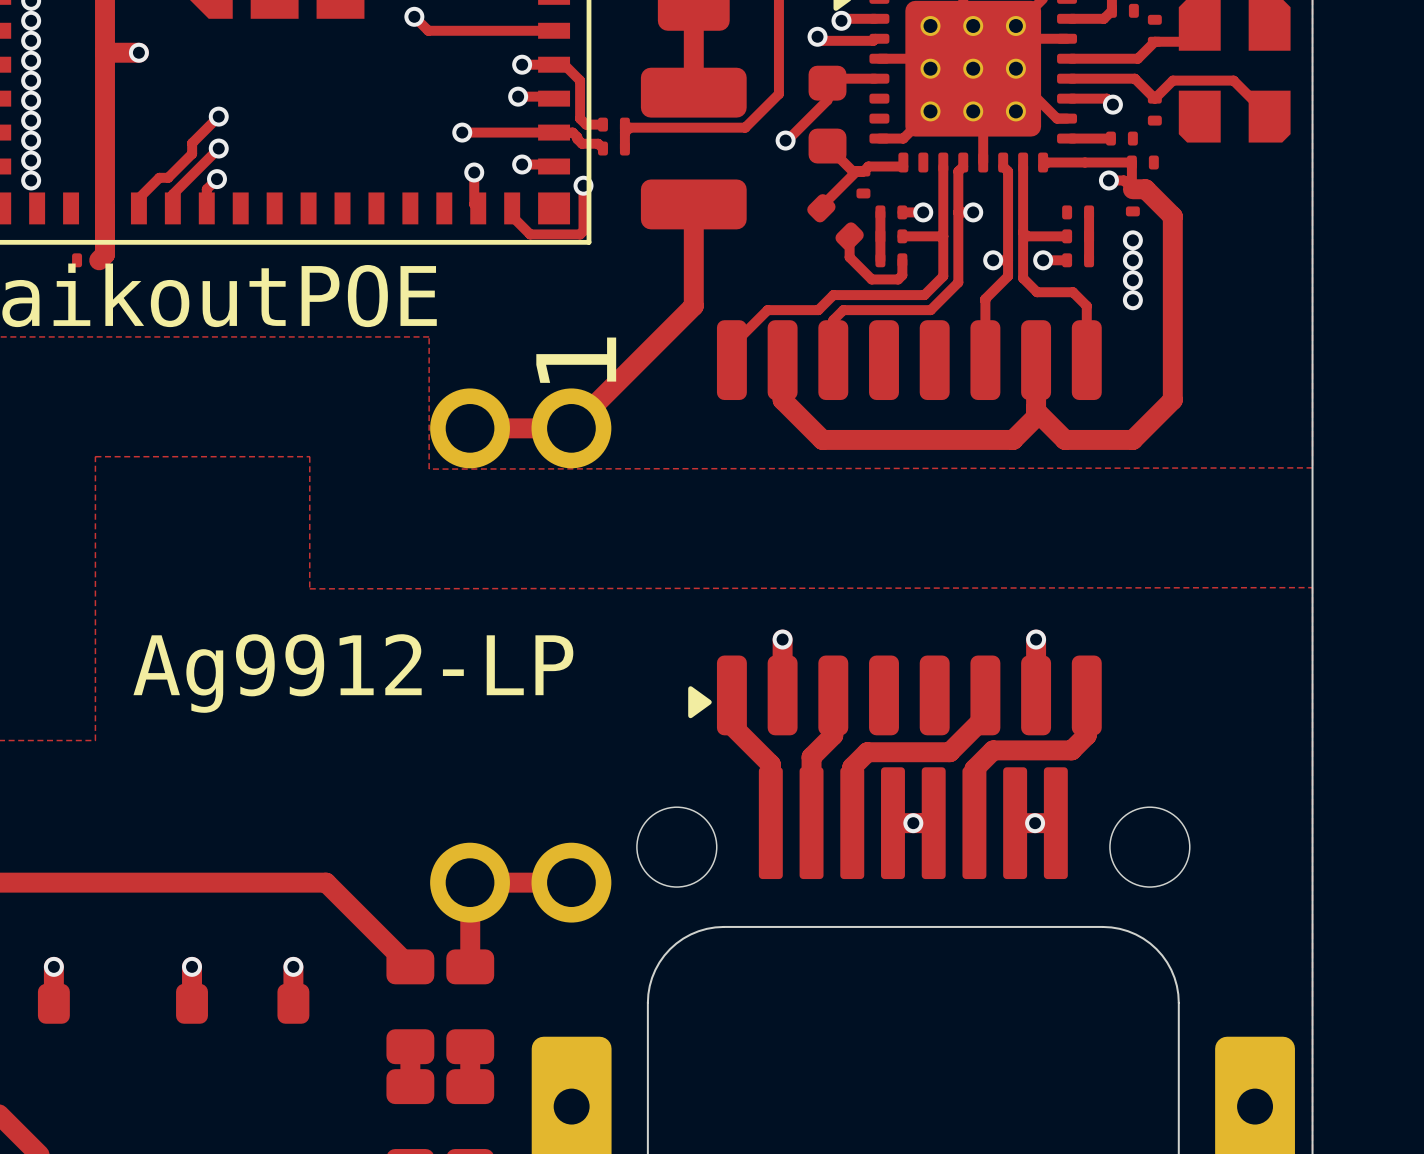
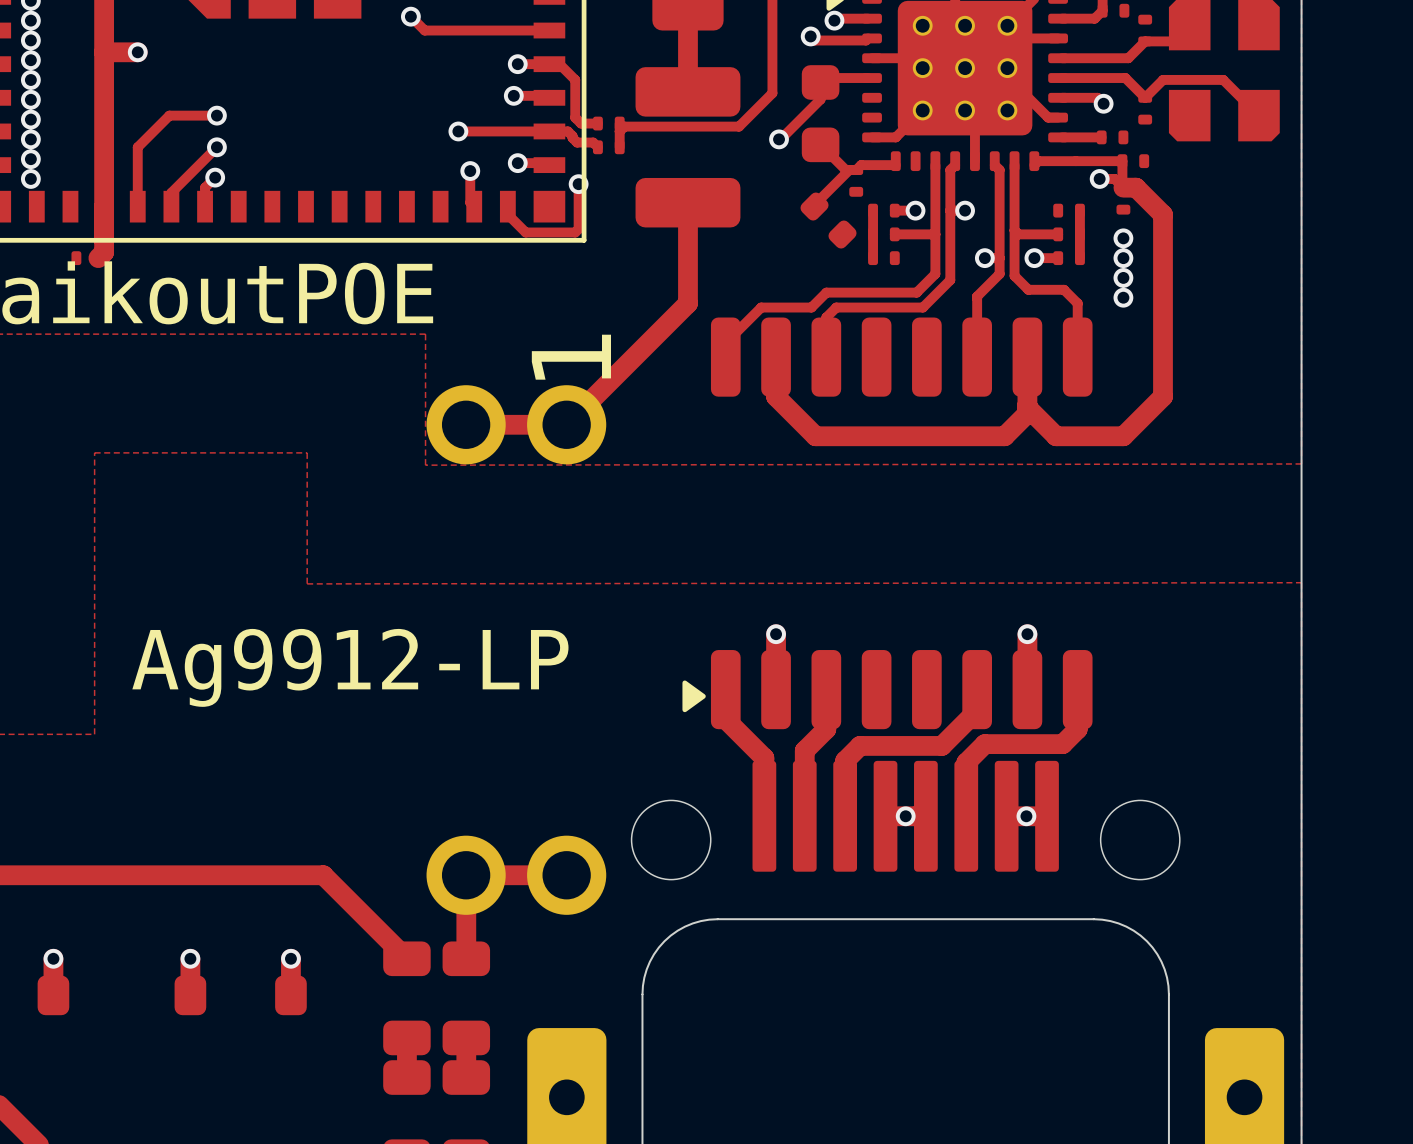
track: (218, 116) (192, 143) (192, 153) (168, 177) (159, 177) (138, 198) -> (216, 115) (169, 115) (137, 147) (137, 196)
track: (849, 236) (849, 257) (871, 279) (898, 279) (902, 275) (902, 260) -> none

